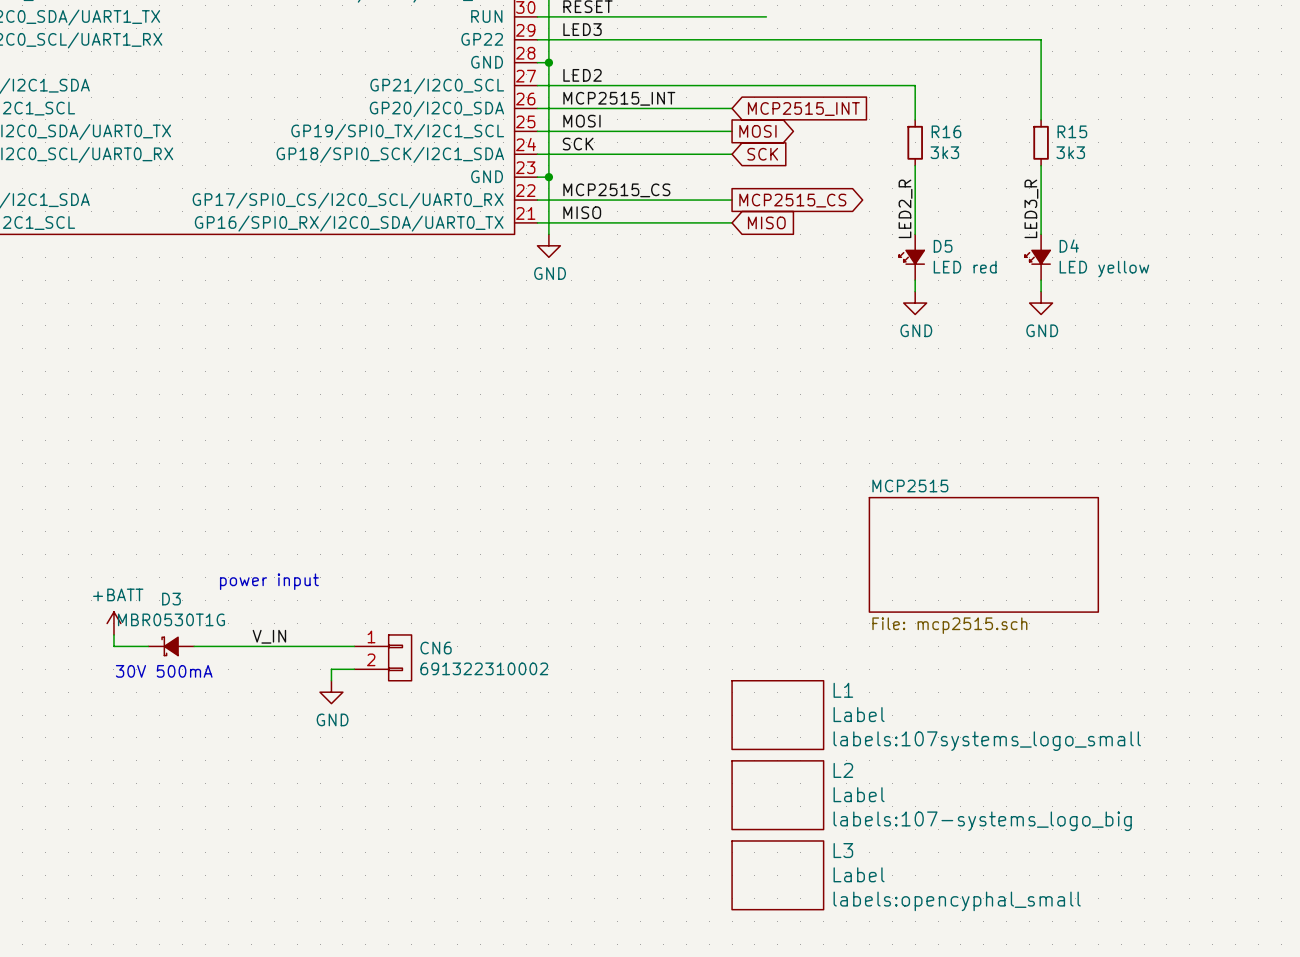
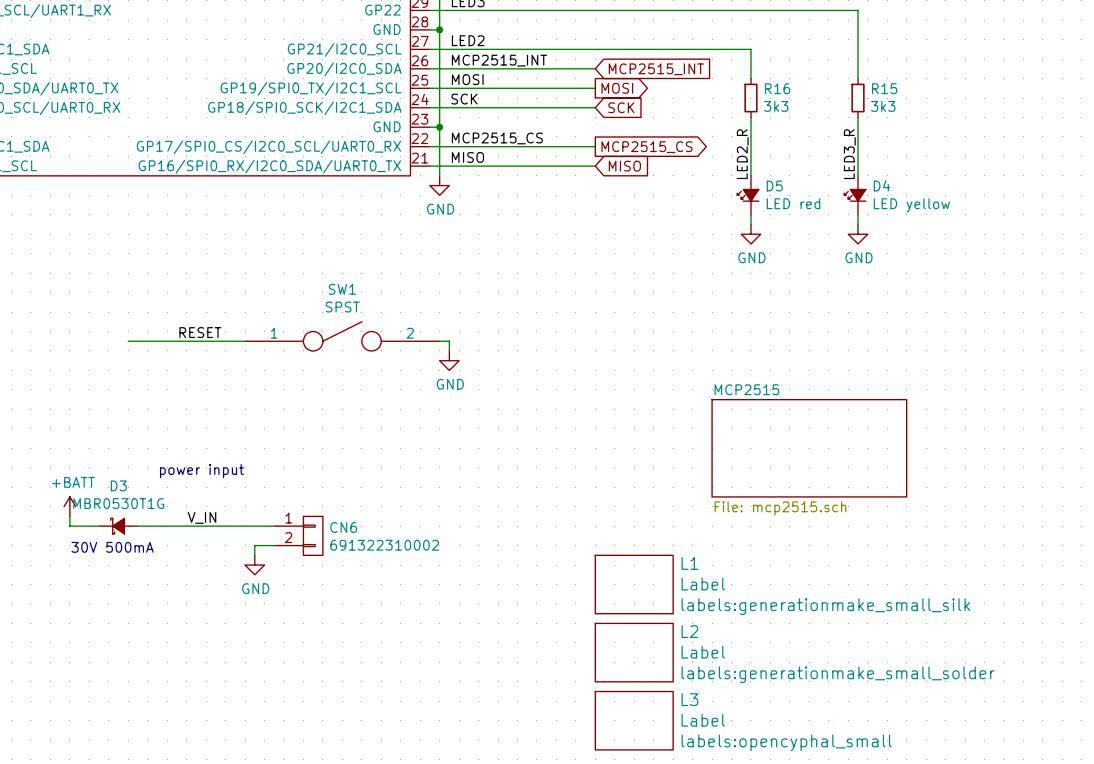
label: none -> RESET (200, 332)
SW1: none -> SPST (342, 336)
wire: none -> (128, 341) (245, 341)
wire: none -> (439, 341) (449, 341) (449, 350)
power symbol: none -> GND (449, 360)
L1 text: labels:107systems_logo_small (987, 741) -> labels:generationmake_small_silk (825, 606)
L2 text: labels:107-systems_logo_big (982, 821) -> labels:generationmake_small_solder (838, 674)

